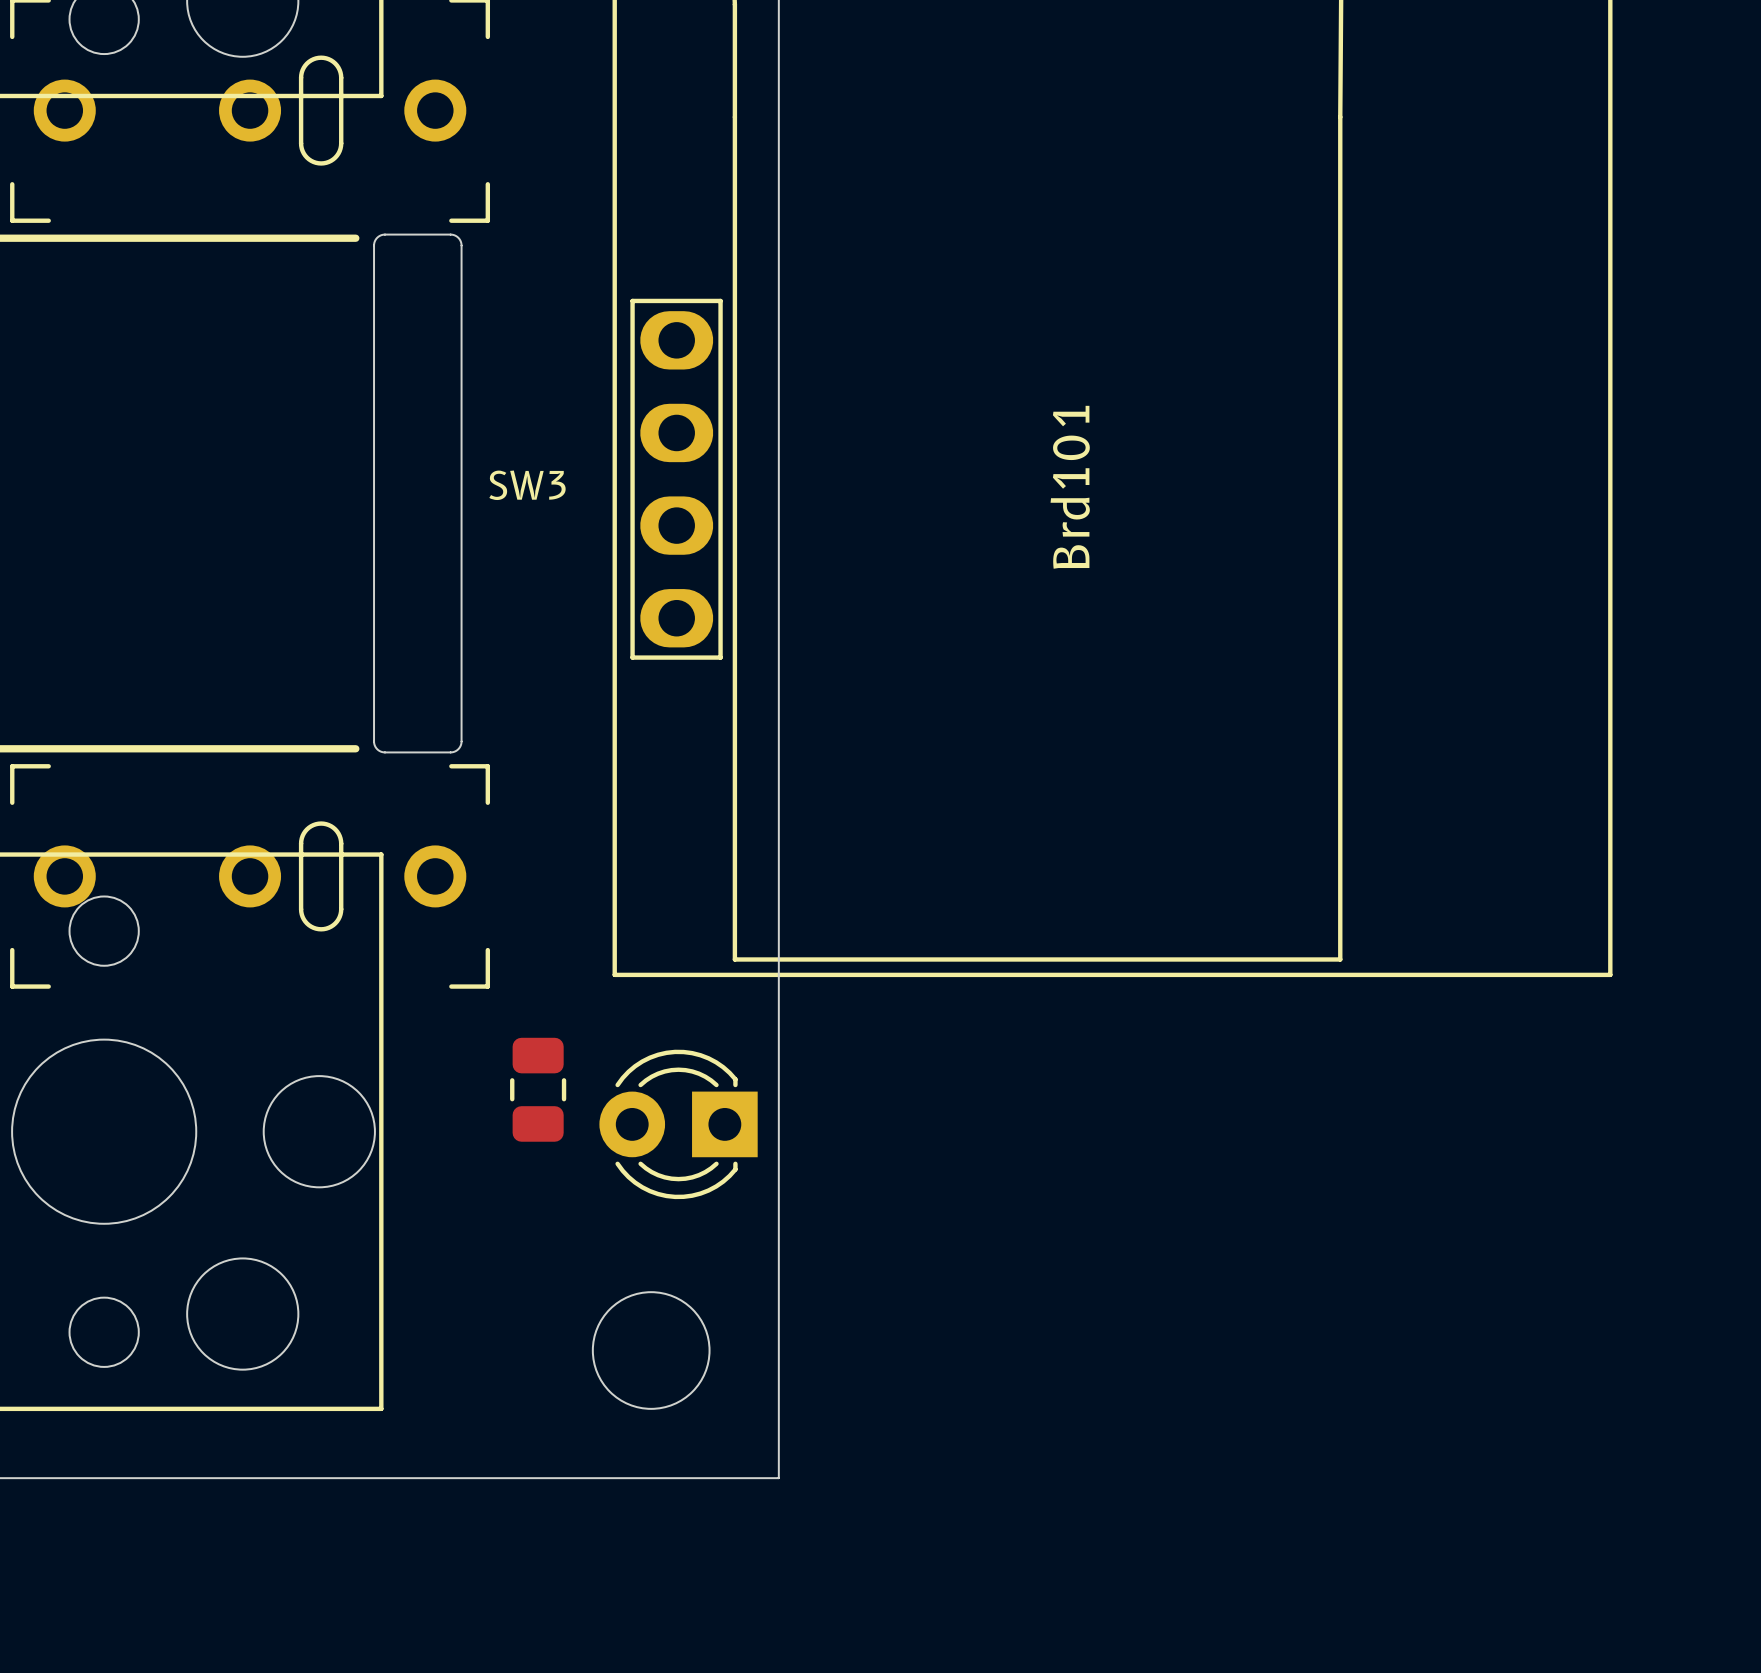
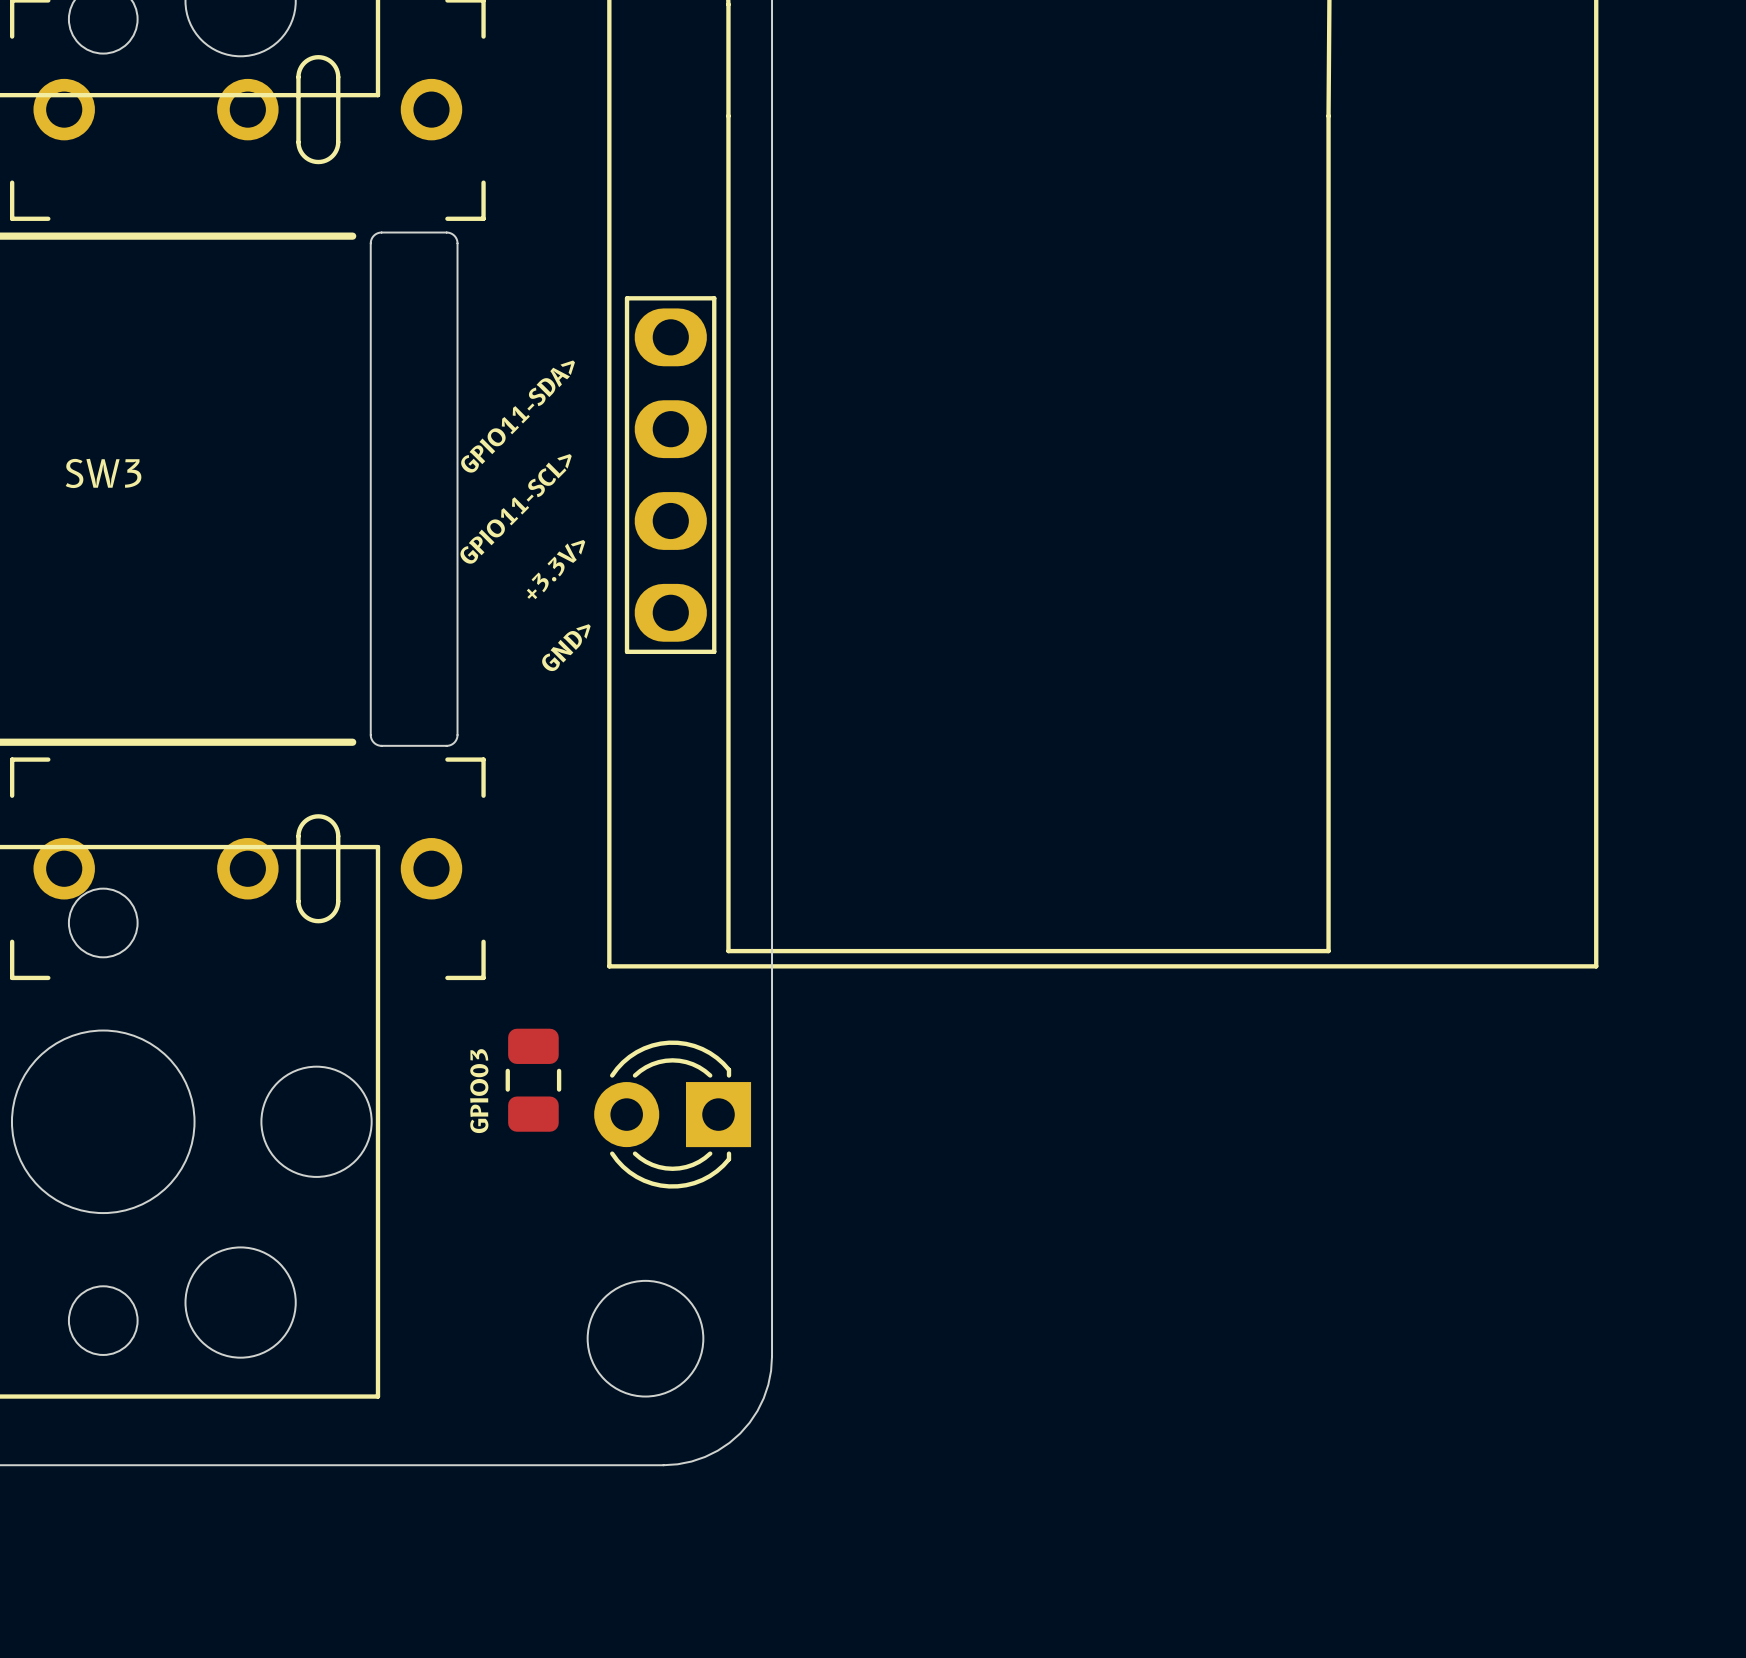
text: none -> GPIO11-SDA> (518, 416)
SW3 name position: SW3 (527, 485) -> SW3 (103, 473)
Brd101 name: Brd101 (1070, 487) -> none
text: none -> GPIO11-SCL> (516, 508)
text: none -> +3.3V> (556, 569)
text: none -> GND> (566, 647)
text: none -> GPIO03 (479, 1091)
board edge: (778, 1368) (778, 1478) (669, 1478) -> (772, 1356) (768, 1384) (763, 1398) (757, 1410) (740, 1433) (717, 1450) (705, 1456) (677, 1464) (663, 1465)

